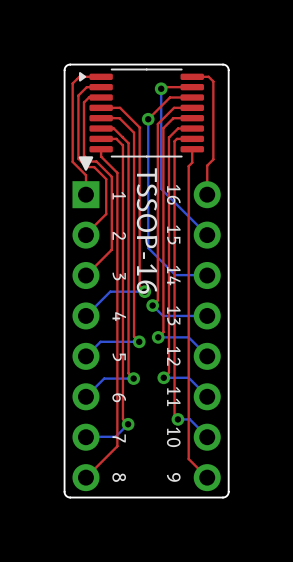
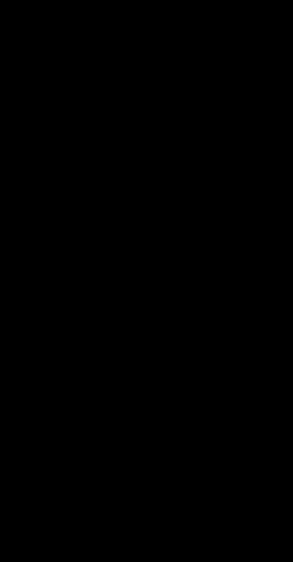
board edge: (70, 64) (223, 64) (228, 68) (228, 491) (224, 497) (70, 497) (64, 494) (64, 70) (66, 66) (70, 64) -> none
top track: (101, 76) (79, 76) (72, 83) (72, 161) (86, 175) (86, 194) -> none
top track: (192, 76) (208, 76) (213, 81) (213, 159) (207, 165) (207, 194) -> none
top track: (101, 87) (86, 87) (78, 95) (78, 158) (86, 167) (94, 167) (106, 179) (106, 214) (85, 235) -> none
top track: (192, 87) (162, 87) (161, 88) -> none
bottom track: (161, 88) (161, 189) (207, 235) -> none
via: (161, 88) -> none
top track: (101, 97) (89, 97) (84, 102) (84, 155) (89, 161) (96, 161) (111, 176) (111, 249) (86, 275) -> none
top track: (192, 97) (169, 97) (148, 119) -> none
top track: (101, 107) (120, 107) (139, 127) (139, 286) (144, 291) -> none
top track: (192, 107) (174, 107) (157, 124) (157, 300) (152, 305) -> none
part: (141, 113) -> none
top track: (101, 118) (119, 118) (134, 132) (134, 336) (139, 341) -> none
top track: (192, 118) (173, 118) (163, 128) (163, 332) (158, 337) -> none
bottom track: (148, 119) (148, 247) (175, 275) (207, 275) -> none
via: (148, 119) -> none
top track: (101, 128) (113, 128) (128, 143) (128, 373) (133, 378) -> none
top track: (192, 128) (178, 128) (168, 137) (168, 372) (163, 377) -> none
top track: (101, 138) (116, 138) (122, 145) (122, 419) (128, 424) -> none
top track: (192, 138) (176, 138) (174, 141) (174, 416) (177, 419) -> none
top track: (101, 149) (101, 156) (117, 172) (117, 446) (86, 477) -> none
top track: (192, 149) (192, 162) (188, 166) (188, 459) (205, 476) -> none
drawing: [78, 156, 94, 171] -> none
text: 16 (173, 194) -> none
text: 1 (119, 195) -> none
text: TSSOP-16 (146, 231) -> none
text: 15 (173, 234) -> none
text: 2 (119, 235) -> none
text: 14 (173, 275) -> none
text: 3 (119, 276) -> none
bottom track: (144, 291) (110, 291) (86, 315) -> none
via: (144, 291) -> none
bottom track: (152, 305) (163, 315) (207, 315) -> none
via: (152, 305) -> none
text: 13 (173, 315) -> none
text: 4 (119, 316) -> none
part: (85, 336) -> none
part: (207, 336) -> none
bottom track: (158, 337) (188, 337) (206, 355) -> none
via: (158, 337) -> none
bottom track: (139, 341) (100, 341) (86, 355) -> none
via: (139, 341) -> none
text: 12 (173, 356) -> none
text: 5 (119, 357) -> none
bottom track: (163, 377) (188, 377) (207, 396) -> none
via: (163, 377) -> none
bottom track: (133, 378) (104, 378) (85, 396) -> none
via: (133, 378) -> none
text: 11 (173, 396) -> none
text: 6 (119, 397) -> none
bottom track: (177, 419) (189, 419) (207, 436) -> none
via: (177, 419) -> none
bottom track: (128, 424) (115, 436) (86, 436) -> none
via: (128, 424) -> none
text: 10 (173, 437) -> none
text: 7 (119, 438) -> none
text: 8 (119, 477) -> none
text: 9 (173, 477) -> none

